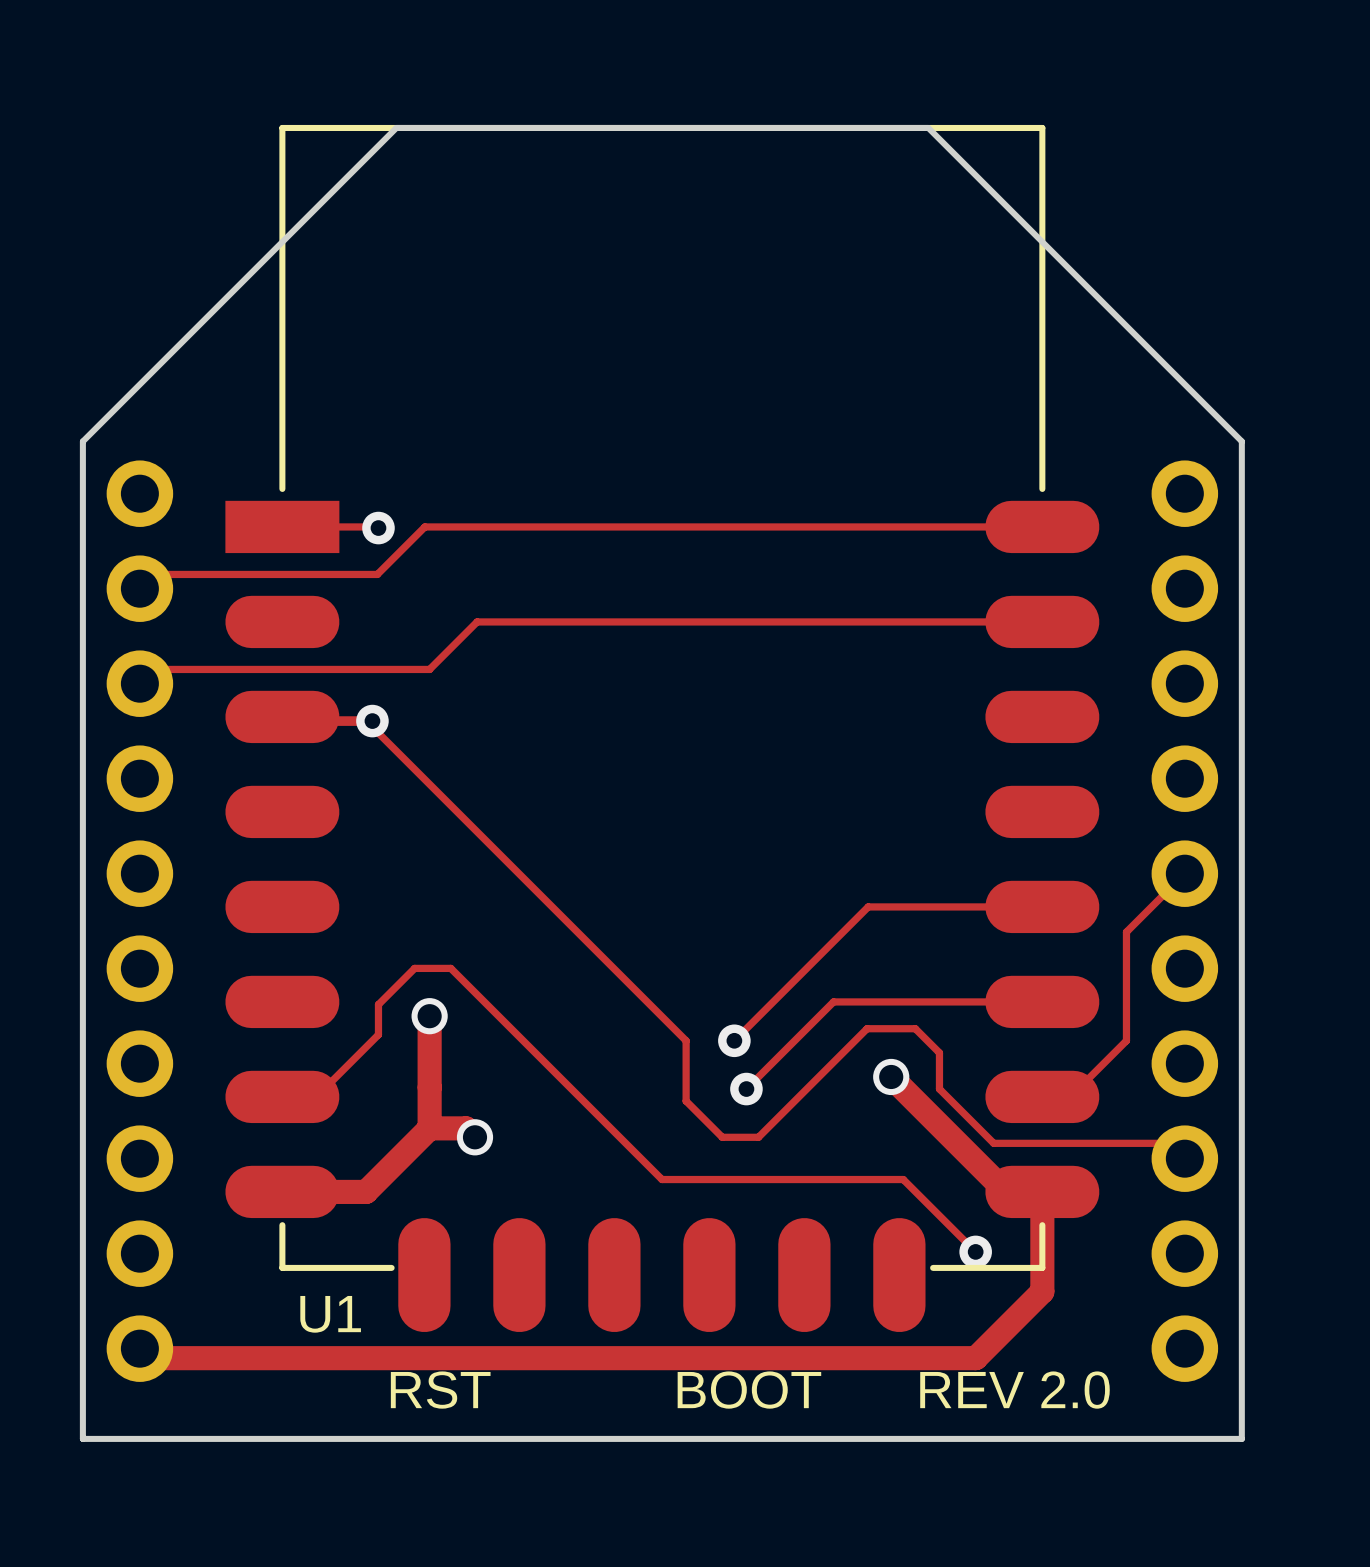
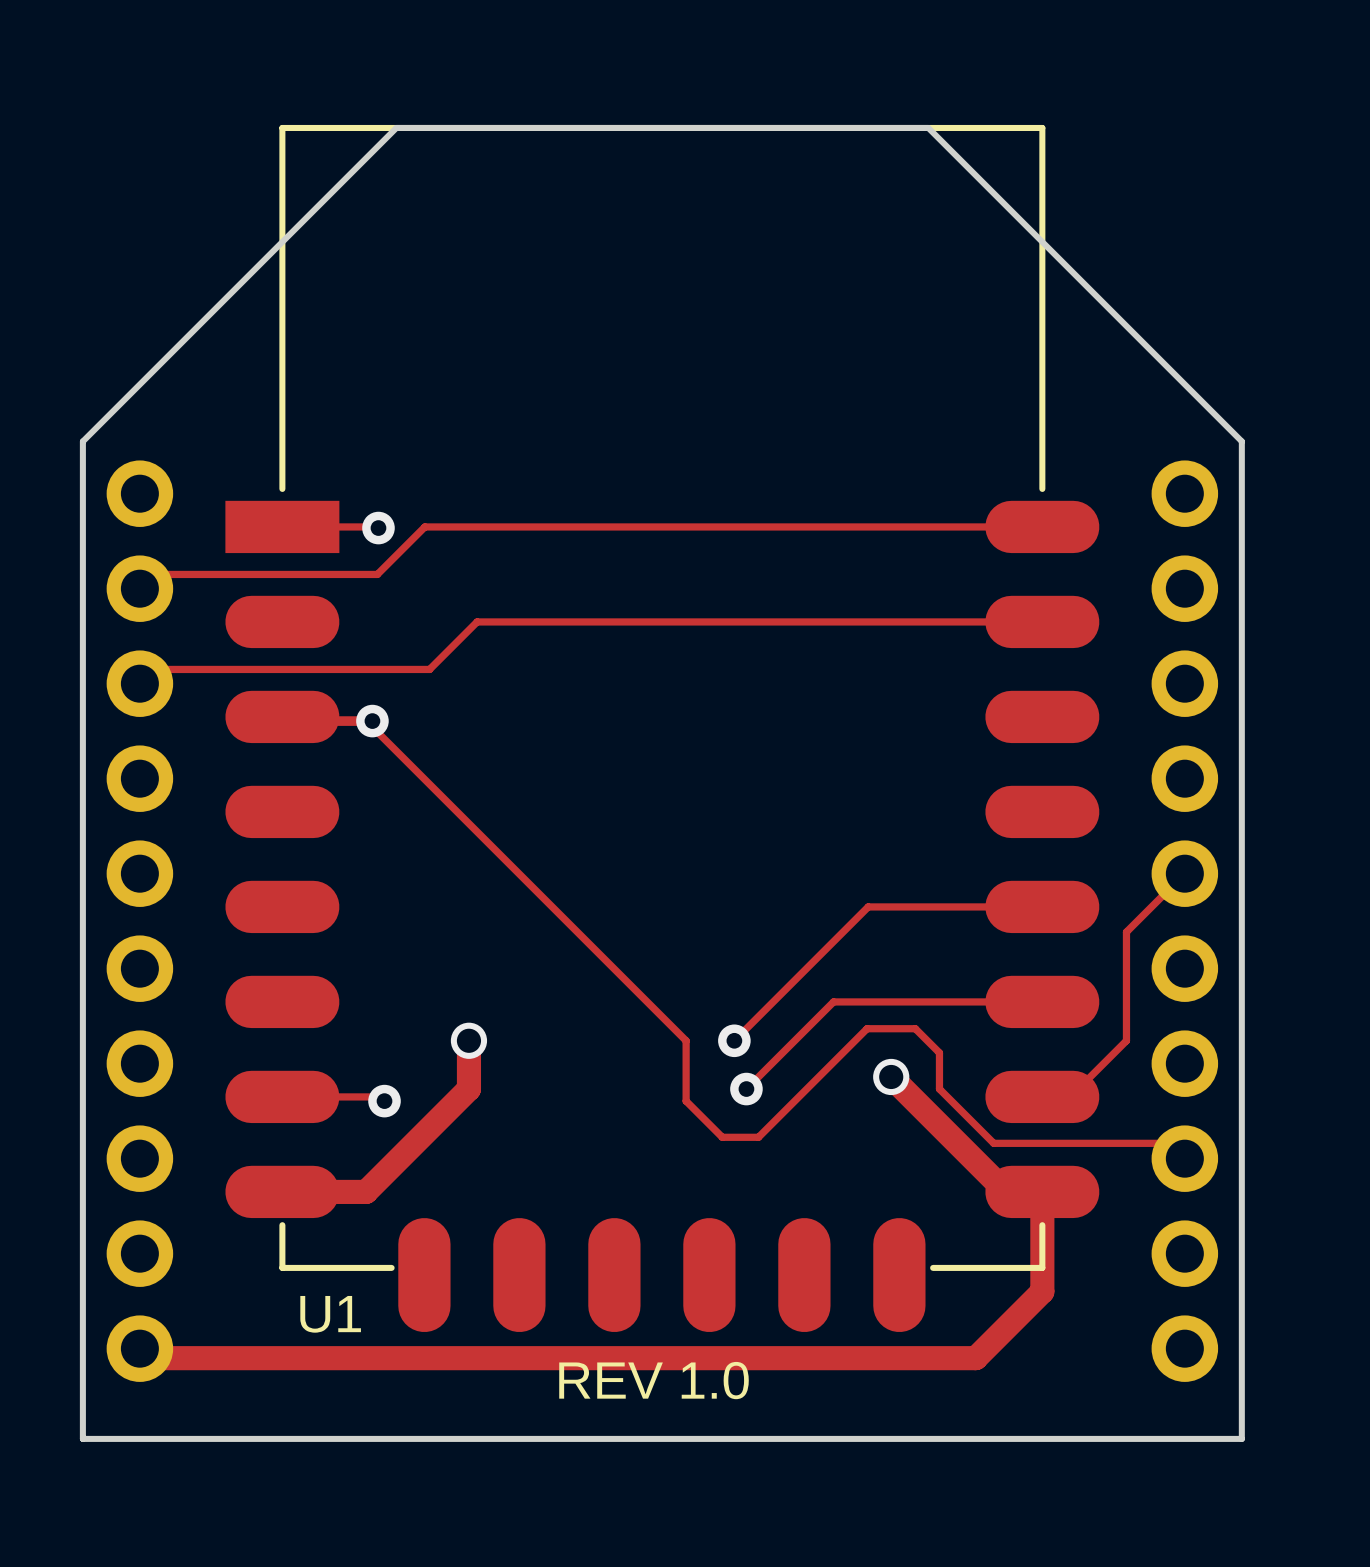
track: (429, 1016) (429, 1128) (466, 1128) (474, 1137) -> none
via position: (429, 1016) -> (468, 1040)
track: none -> (468, 1040) (468, 1089) (429, 1128)
track: (316, 1096) (378, 1034) (378, 1004) (414, 968) (450, 968) (661, 1179) (903, 1179) (975, 1251) -> (316, 1096) (380, 1096) (384, 1101)
via: none -> (384, 1101)
via: (474, 1137) -> none
via: (975, 1251) -> none
text: none -> REV 1.0 (654, 1380)
text: RST (440, 1390) -> none
text: BOOT (749, 1390) -> none
text: REV 2.0 (1014, 1390) -> none

